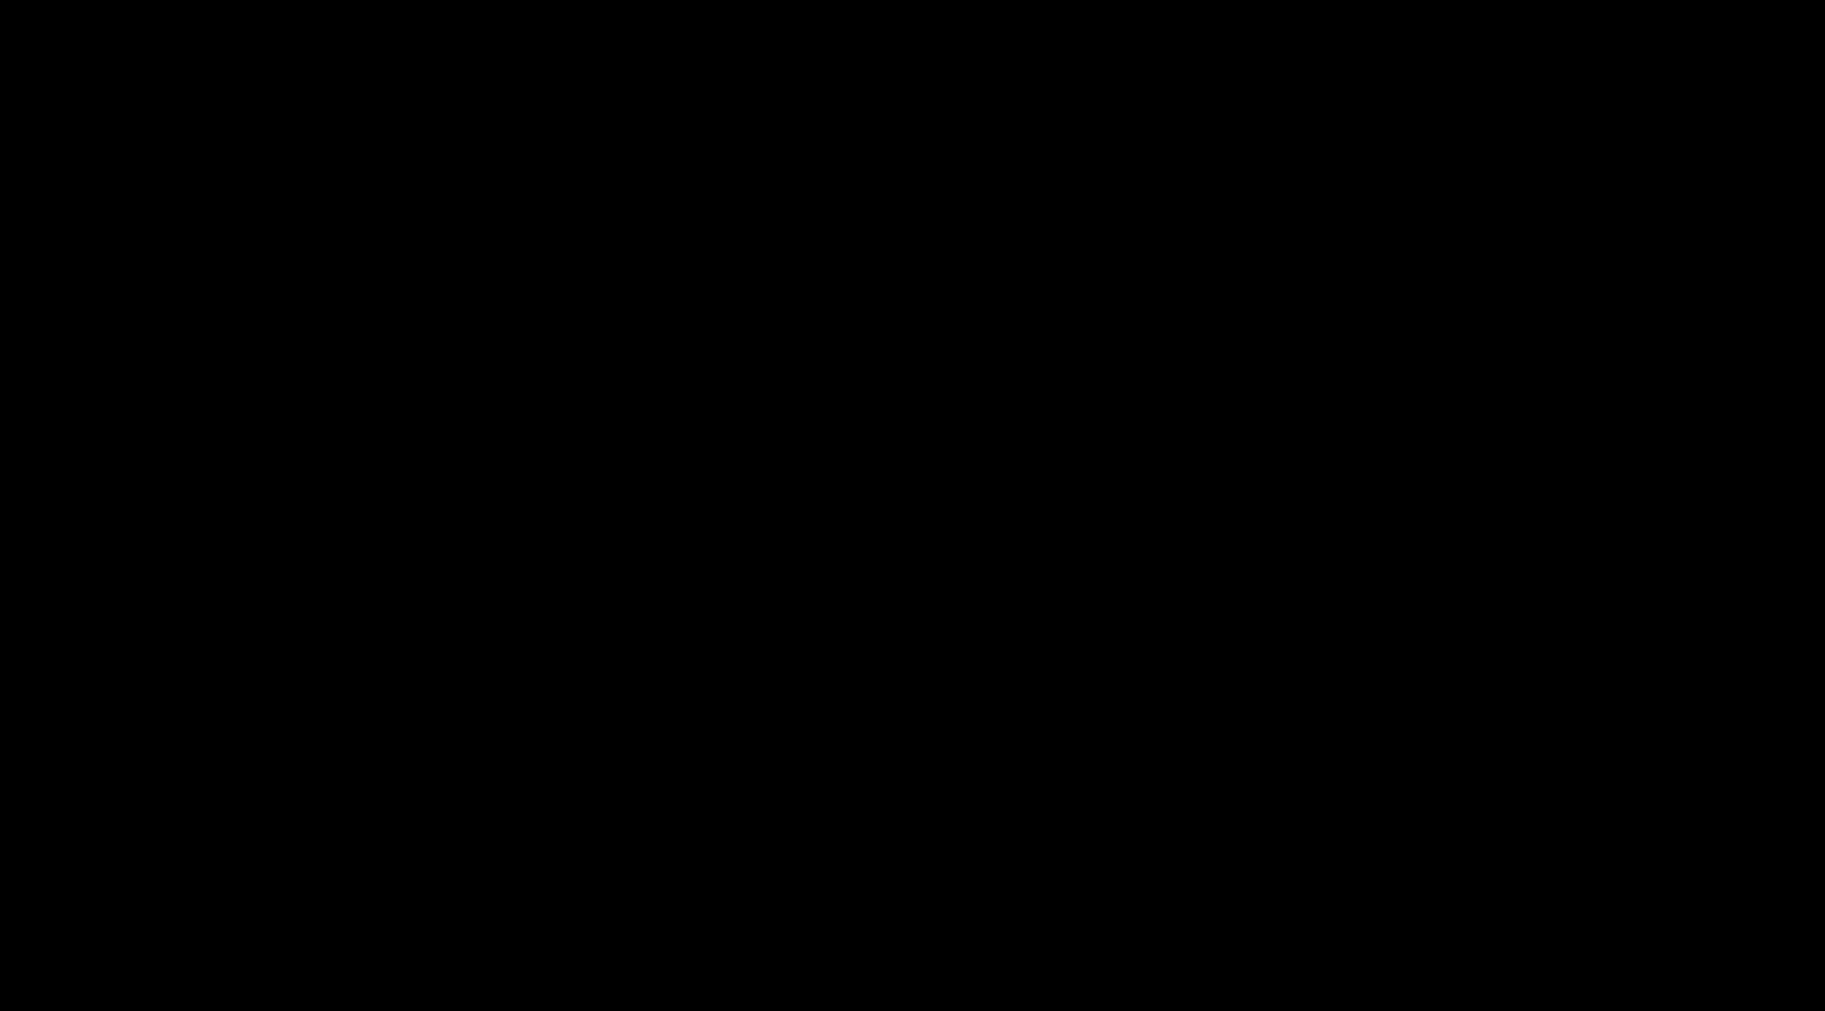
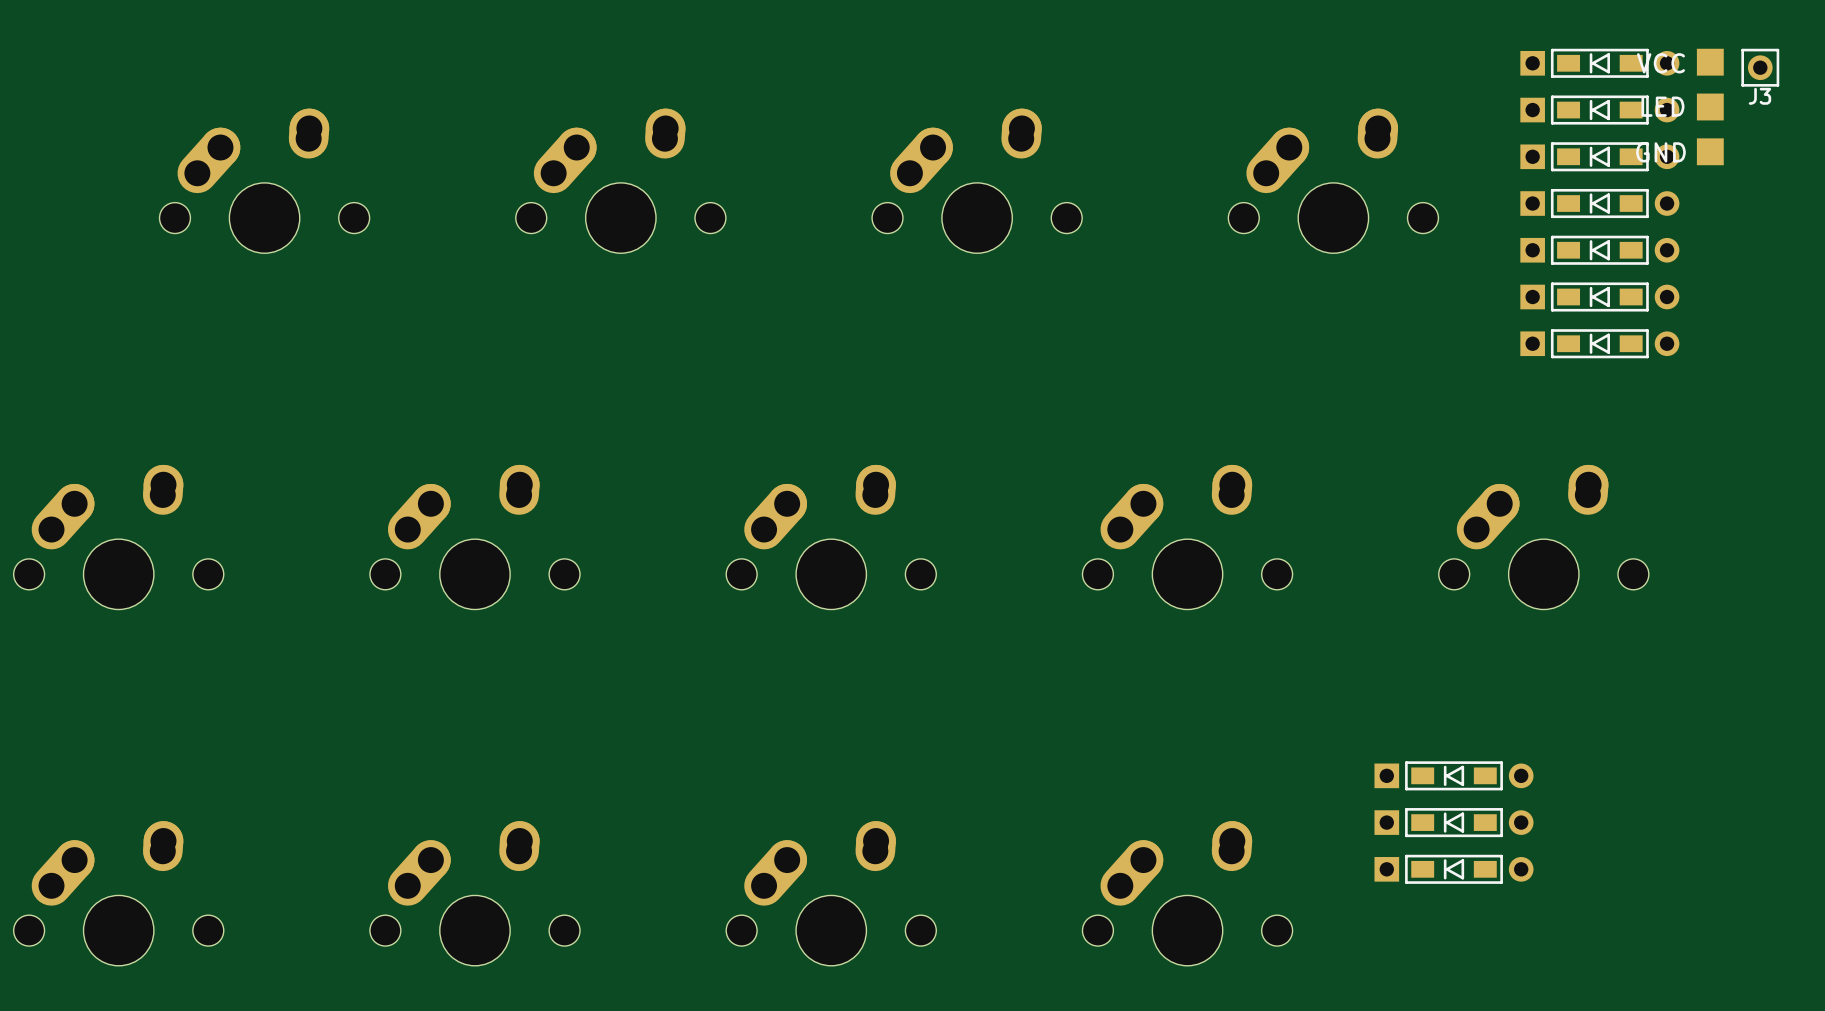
part: none -> (1599, 63)
J3: none -> (1760, 67)
part: none -> (1710, 106)
part: none -> (1599, 110)
part: none -> (1599, 156)
part: none -> (264, 180)
part: none -> (620, 180)
part: none -> (977, 180)
part: none -> (1333, 180)
part: none -> (1599, 203)
part: none -> (1599, 250)
part: none -> (1599, 296)
part: none -> (1599, 343)
part: none -> (118, 537)
part: none -> (474, 537)
part: none -> (831, 537)
part: none -> (1187, 537)
part: none -> (1543, 537)
part: none -> (1454, 775)
part: none -> (1454, 822)
part: none -> (1454, 869)
part: none -> (118, 893)
part: none -> (474, 893)
part: none -> (831, 893)
part: none -> (1187, 893)

